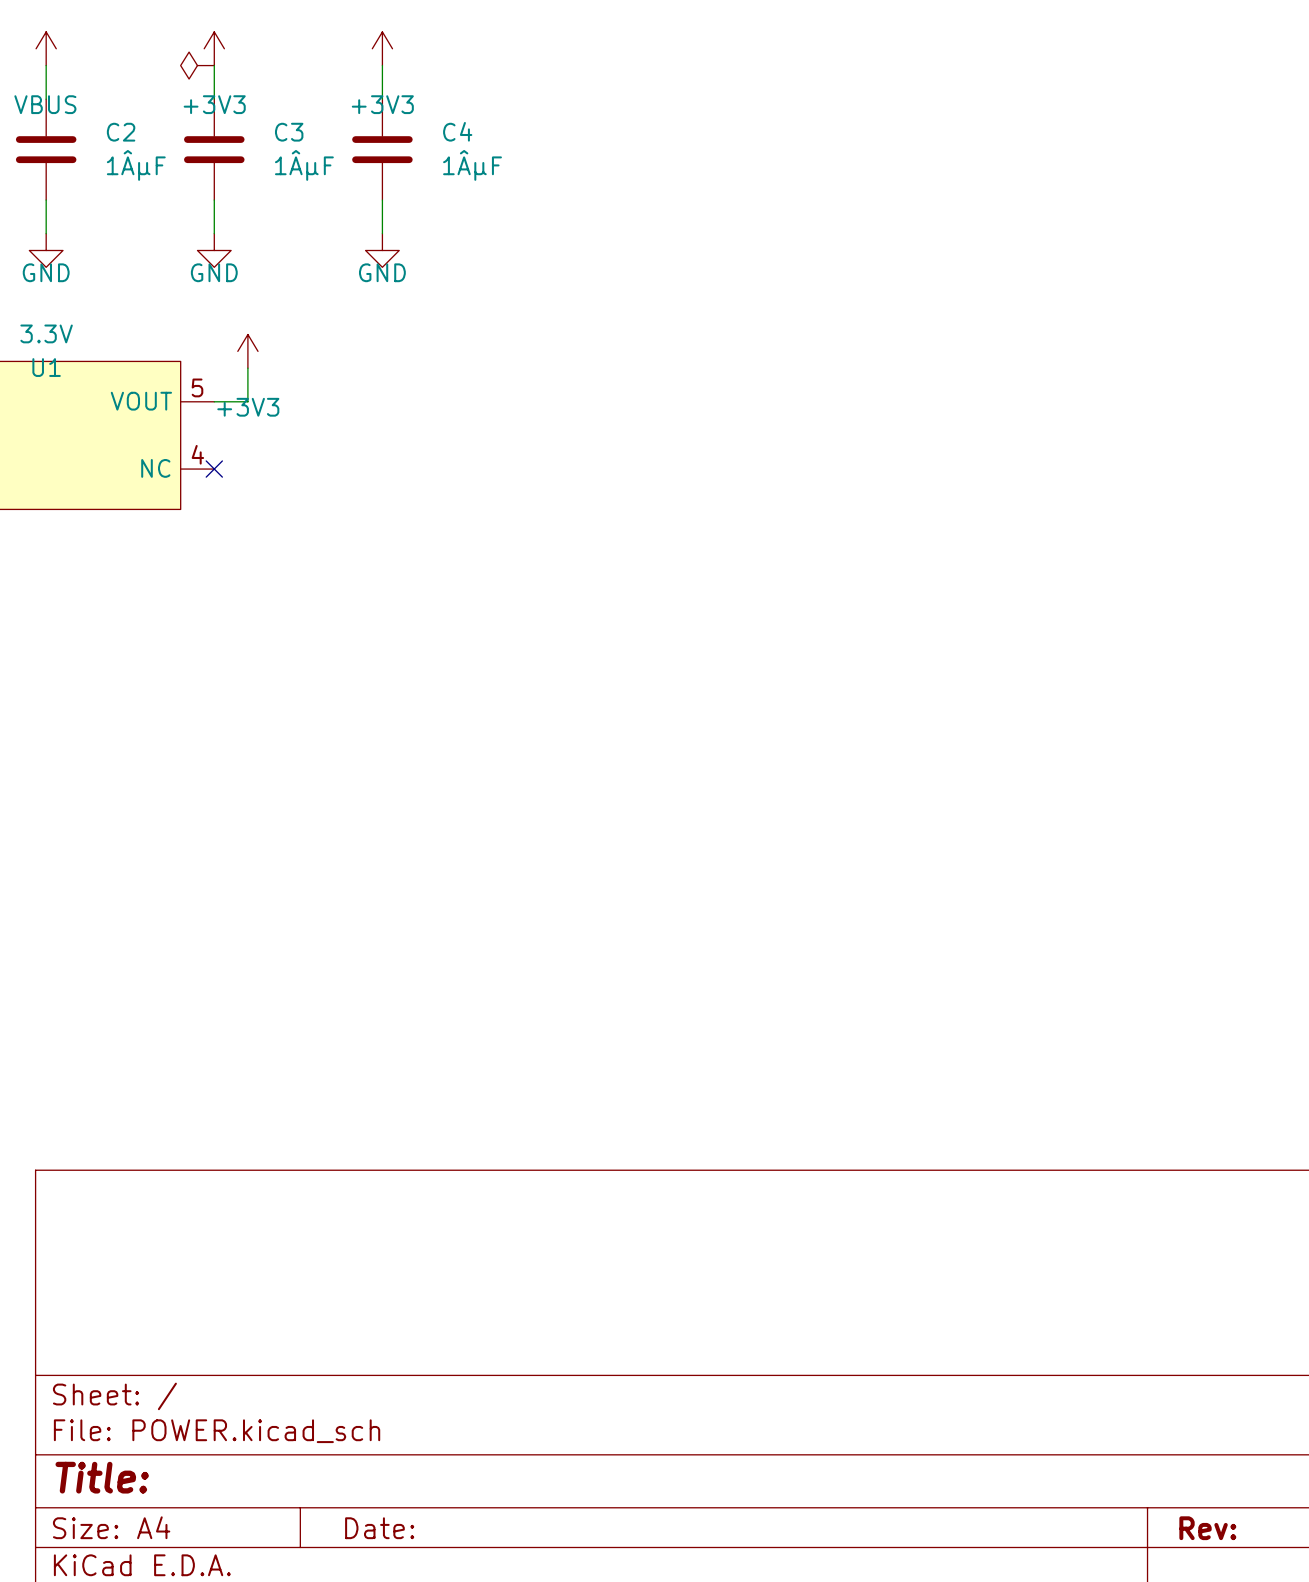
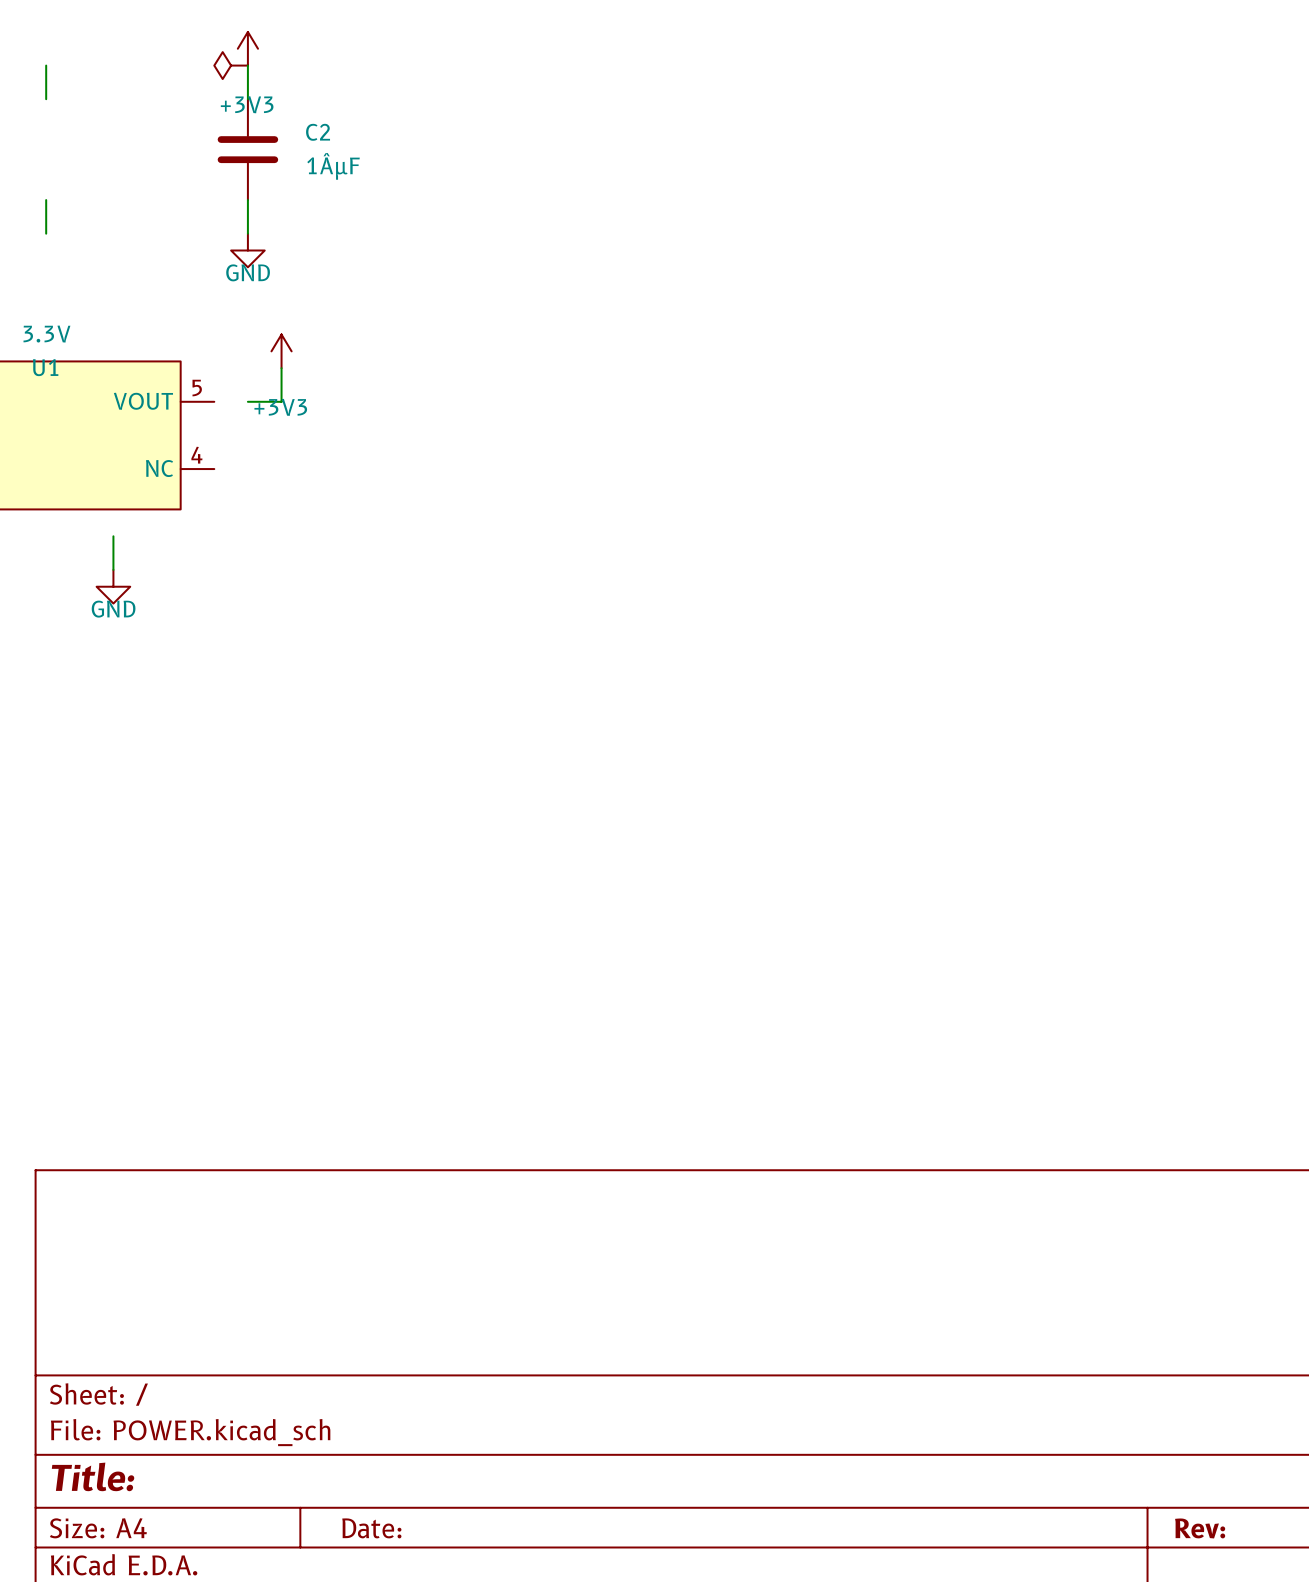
power symbol: VBUS (46, 48) -> none
power symbol position: +3V3 (214, 48) -> +3V3 (247, 48)
power symbol: +3V3 (382, 48) -> none
power symbol position: (197, 65) -> (231, 65)
wire: (214, 65) (214, 99) -> (247, 65) (247, 99)
wire: (382, 65) (382, 99) -> none
C2 position: (46, 149) -> (247, 149)
C3: 1ÂµF (214, 149) -> none
C4: 1ÂµF (382, 149) -> none
wire: (214, 200) (214, 233) -> (247, 200) (247, 233)
wire: (382, 200) (382, 233) -> none
power symbol: GND (46, 250) -> none
power symbol position: GND (214, 250) -> GND (247, 250)
power symbol: GND (382, 250) -> none
power symbol position: +3V3 (247, 351) -> +3V3 (281, 351)
wire: (247, 368) (247, 401) (214, 401) -> (281, 368) (281, 401) (247, 401)
no-connect mark: (214, 469) -> none
wire: none -> (113, 536) (113, 569)
power symbol: none -> GND (113, 586)

